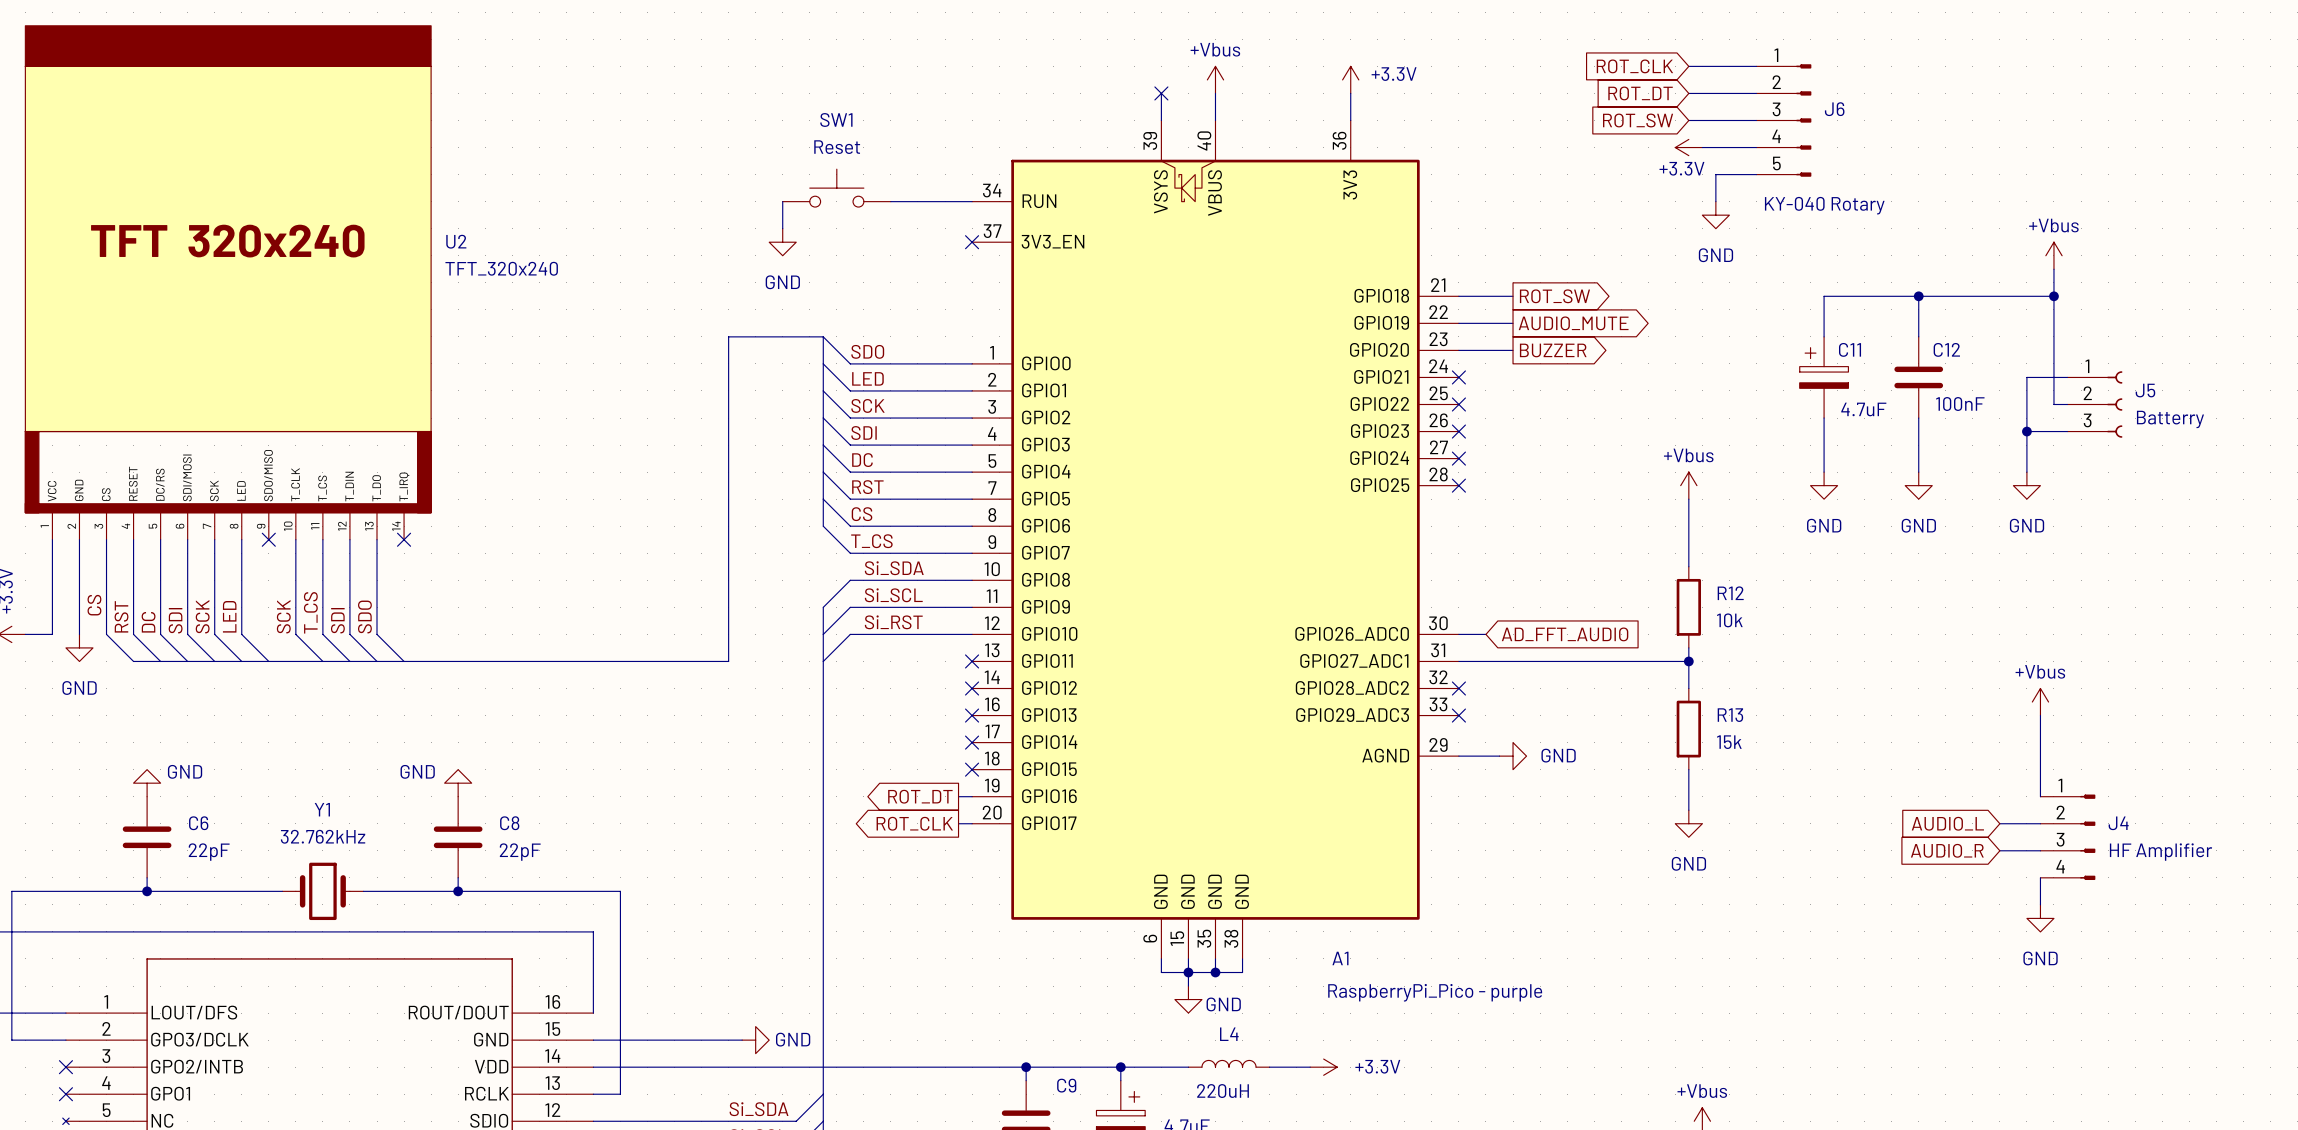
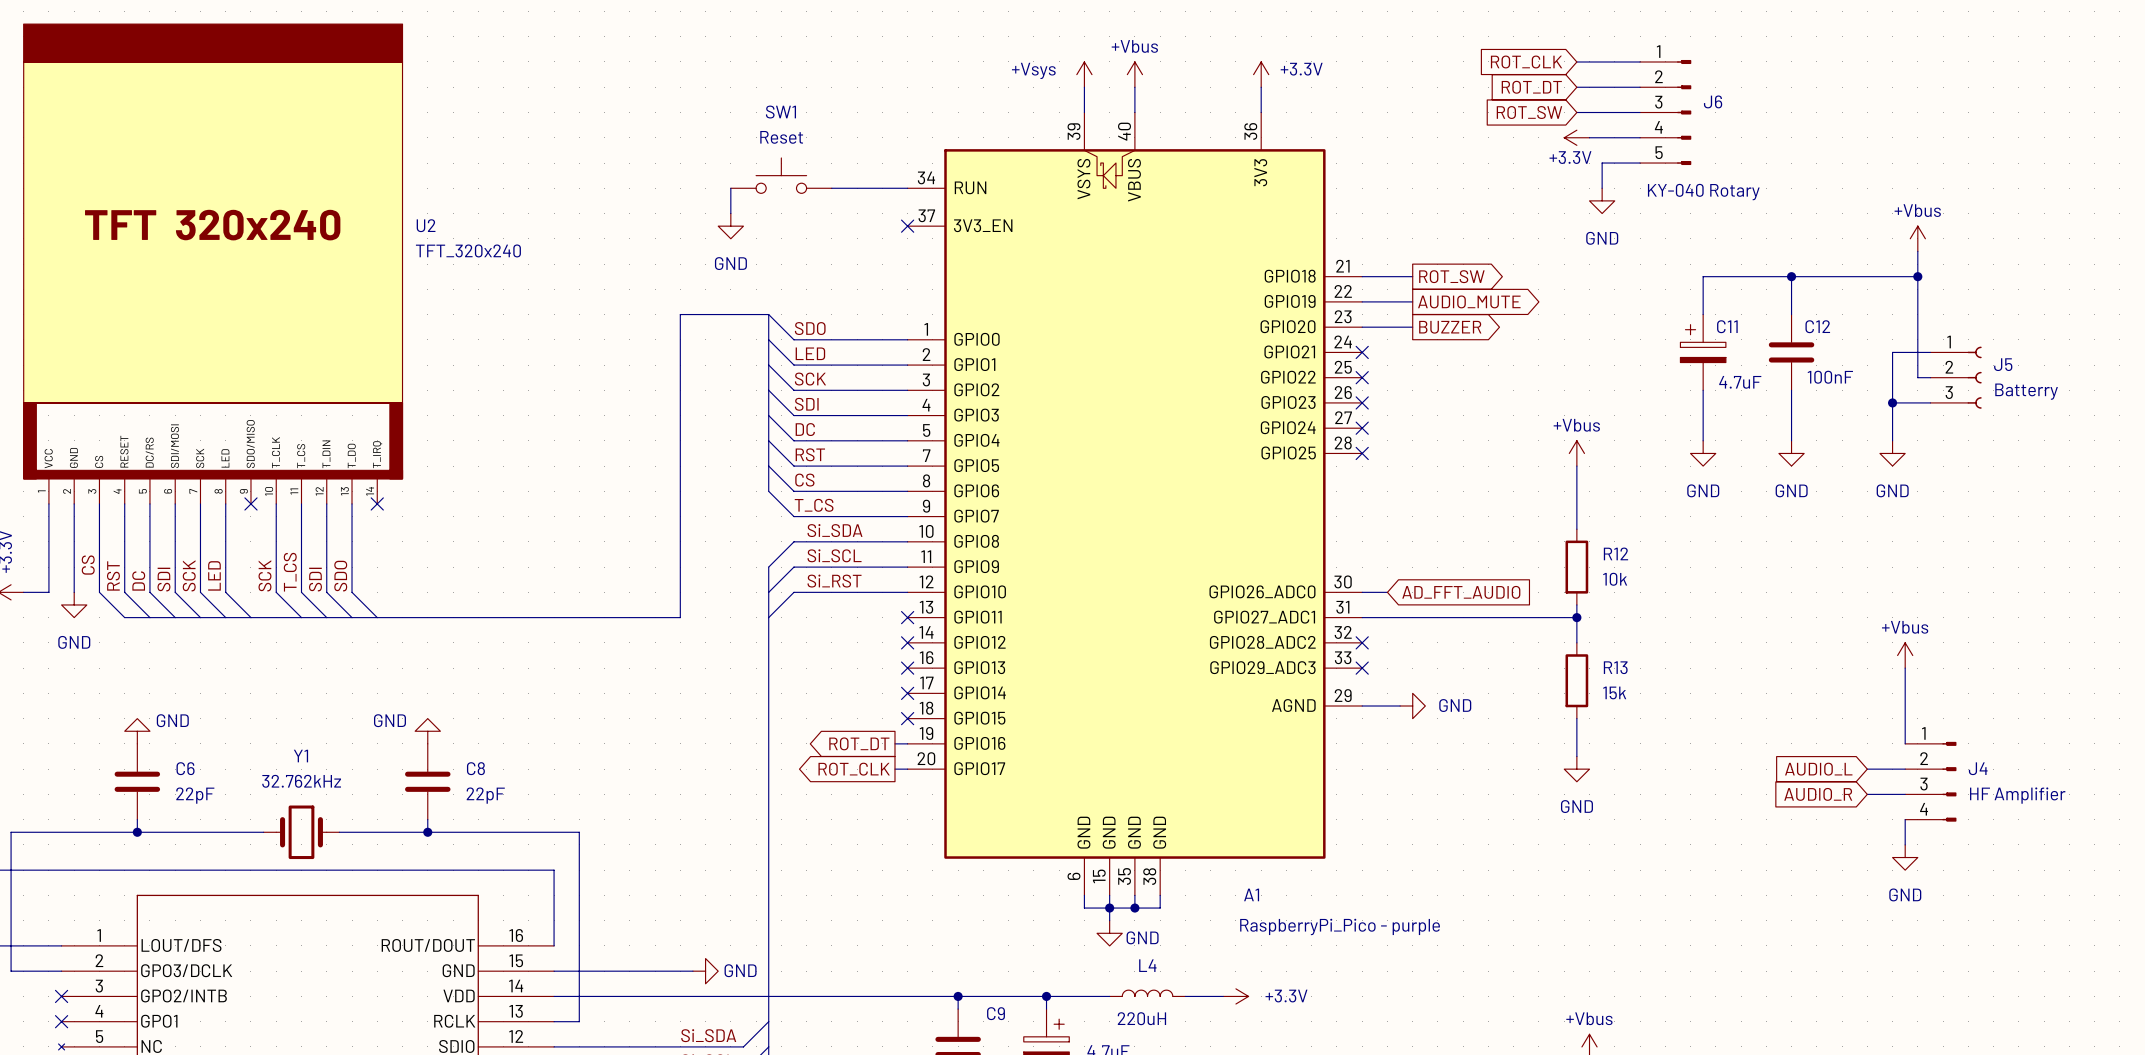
power symbol: none -> +Vsys (1084, 74)
no-connect mark: (1161, 93) -> none

